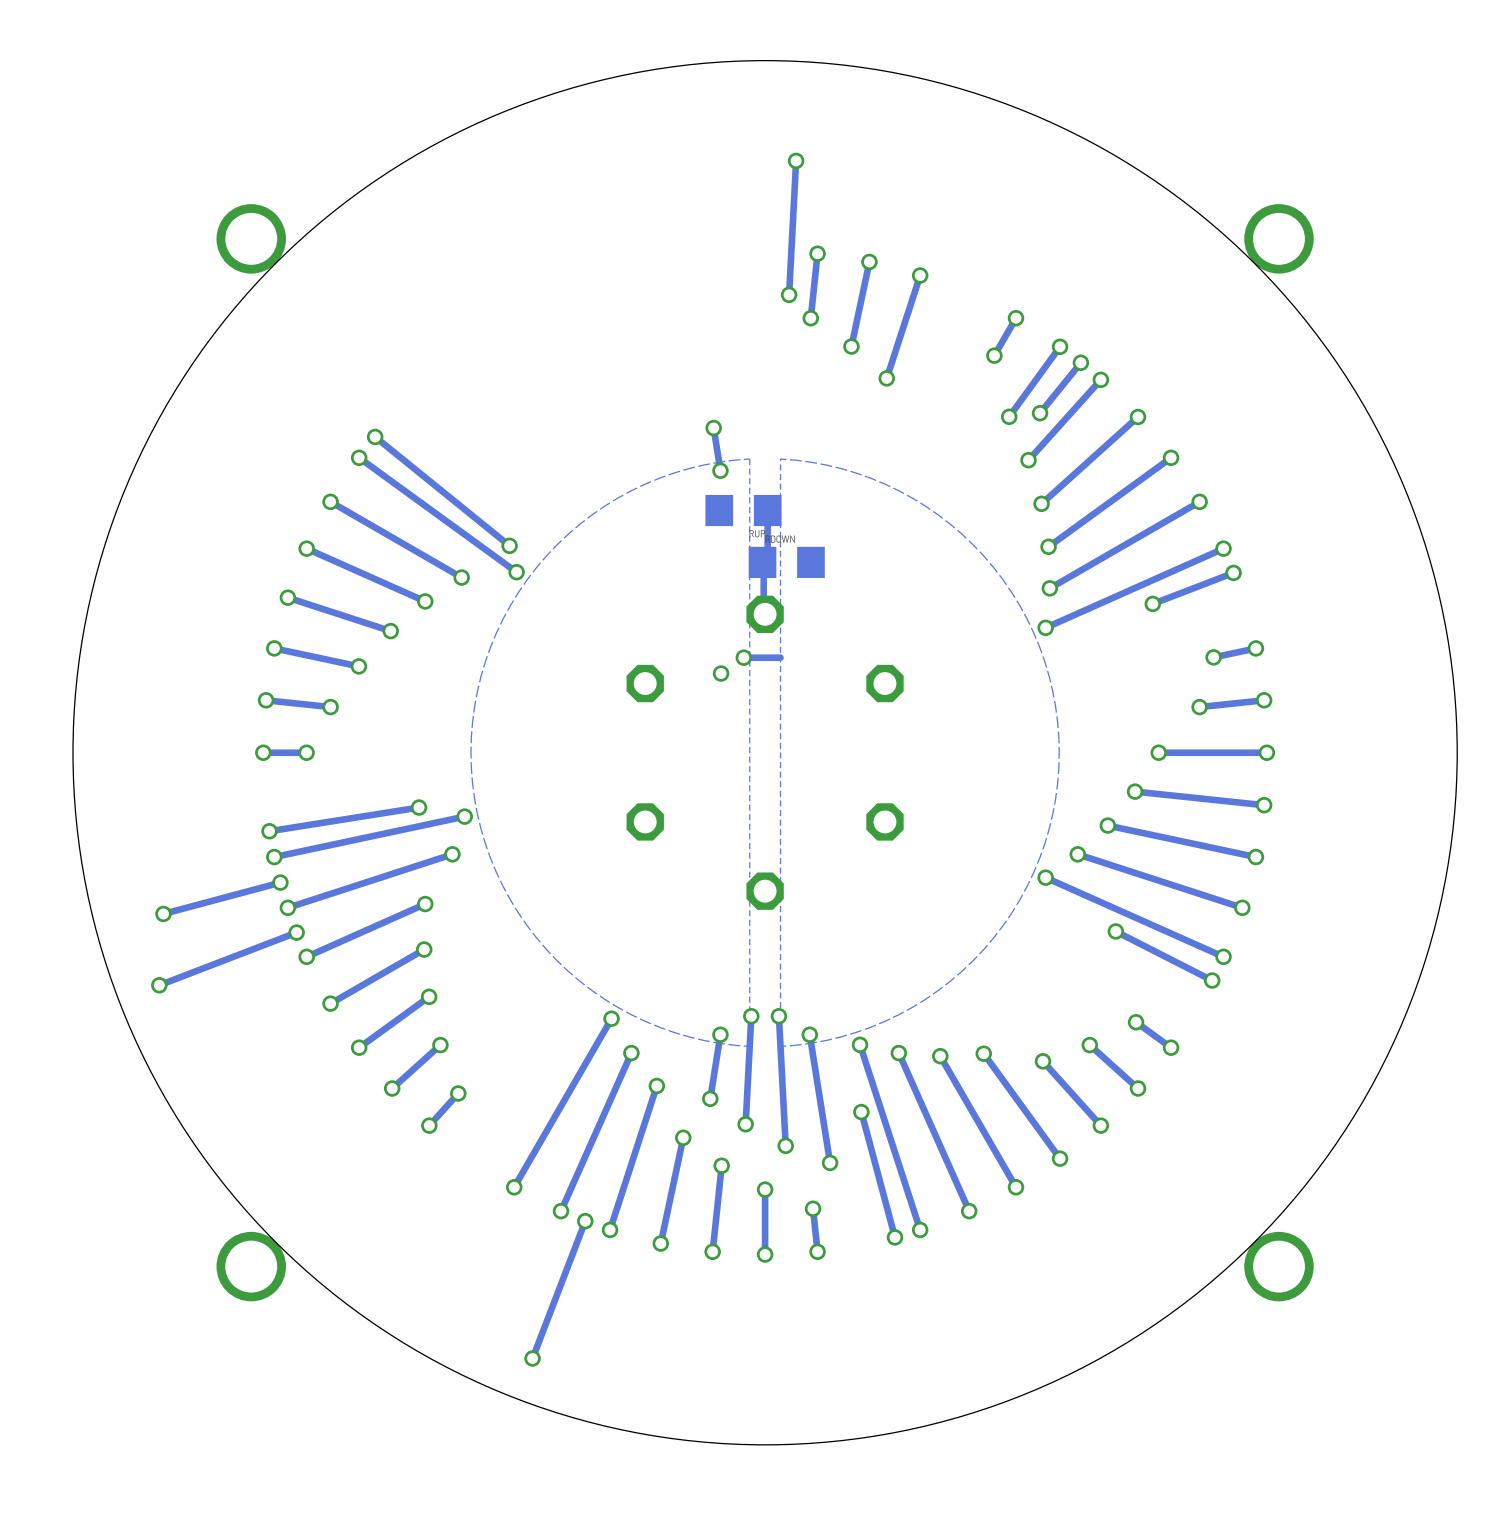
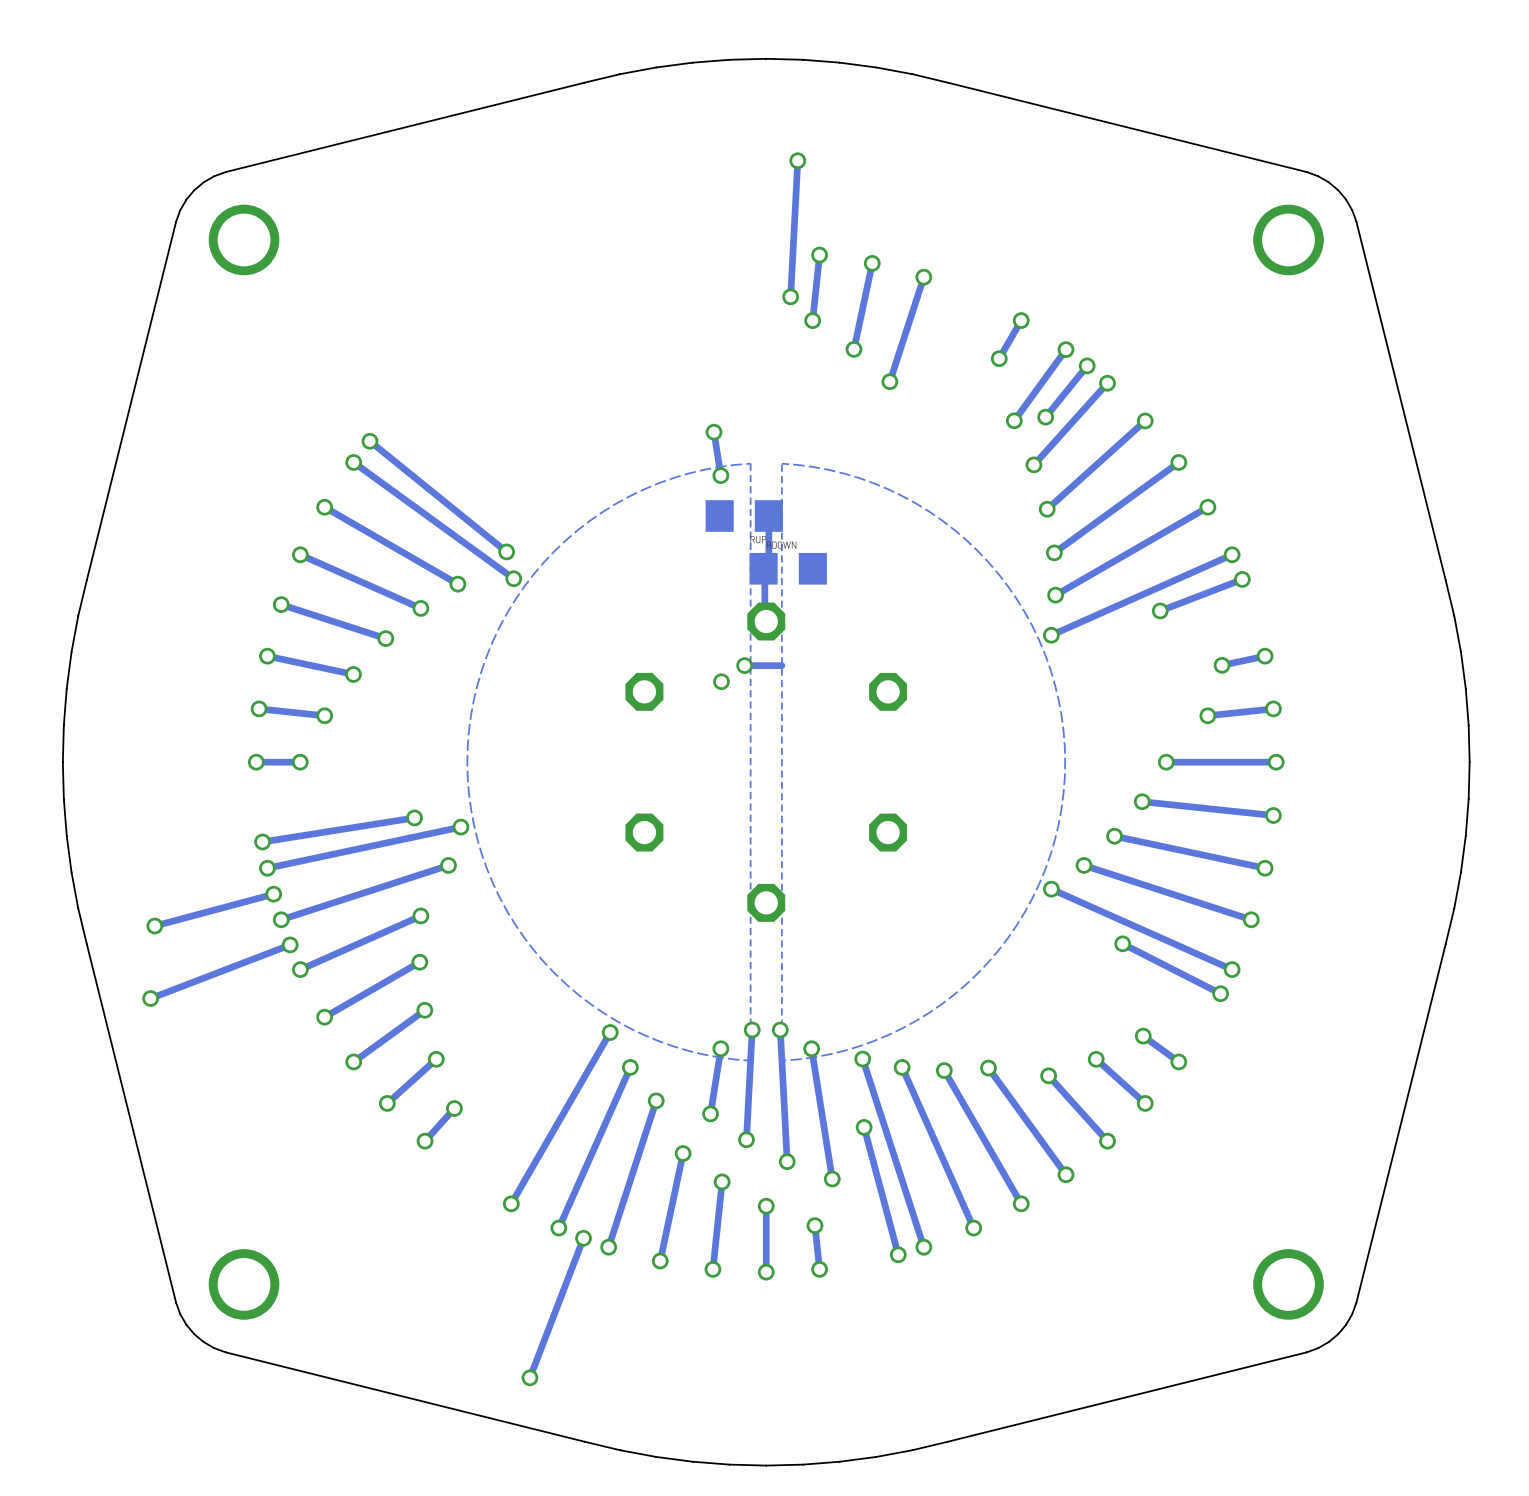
round board edge: [72, 60, 1458, 1446] -> none
board edge: none -> (766, 58) (839, 62) (912, 74) (1306, 172) (1318, 176) (1338, 190) (1352, 210) (1356, 221) (1454, 615) (1465, 688) (1469, 762) (1465, 835) (1454, 908) (1356, 1302) (1352, 1314) (1338, 1334) (1318, 1348) (1306, 1352) (912, 1450) (839, 1461) (766, 1465) (692, 1461) (620, 1450) (225, 1352) (214, 1348) (194, 1334) (180, 1314) (176, 1302) (78, 908) (66, 835) (62, 762) (66, 688) (78, 615) (176, 221) (180, 210) (194, 190) (214, 176) (225, 172) (620, 74) (692, 62) (766, 58)

